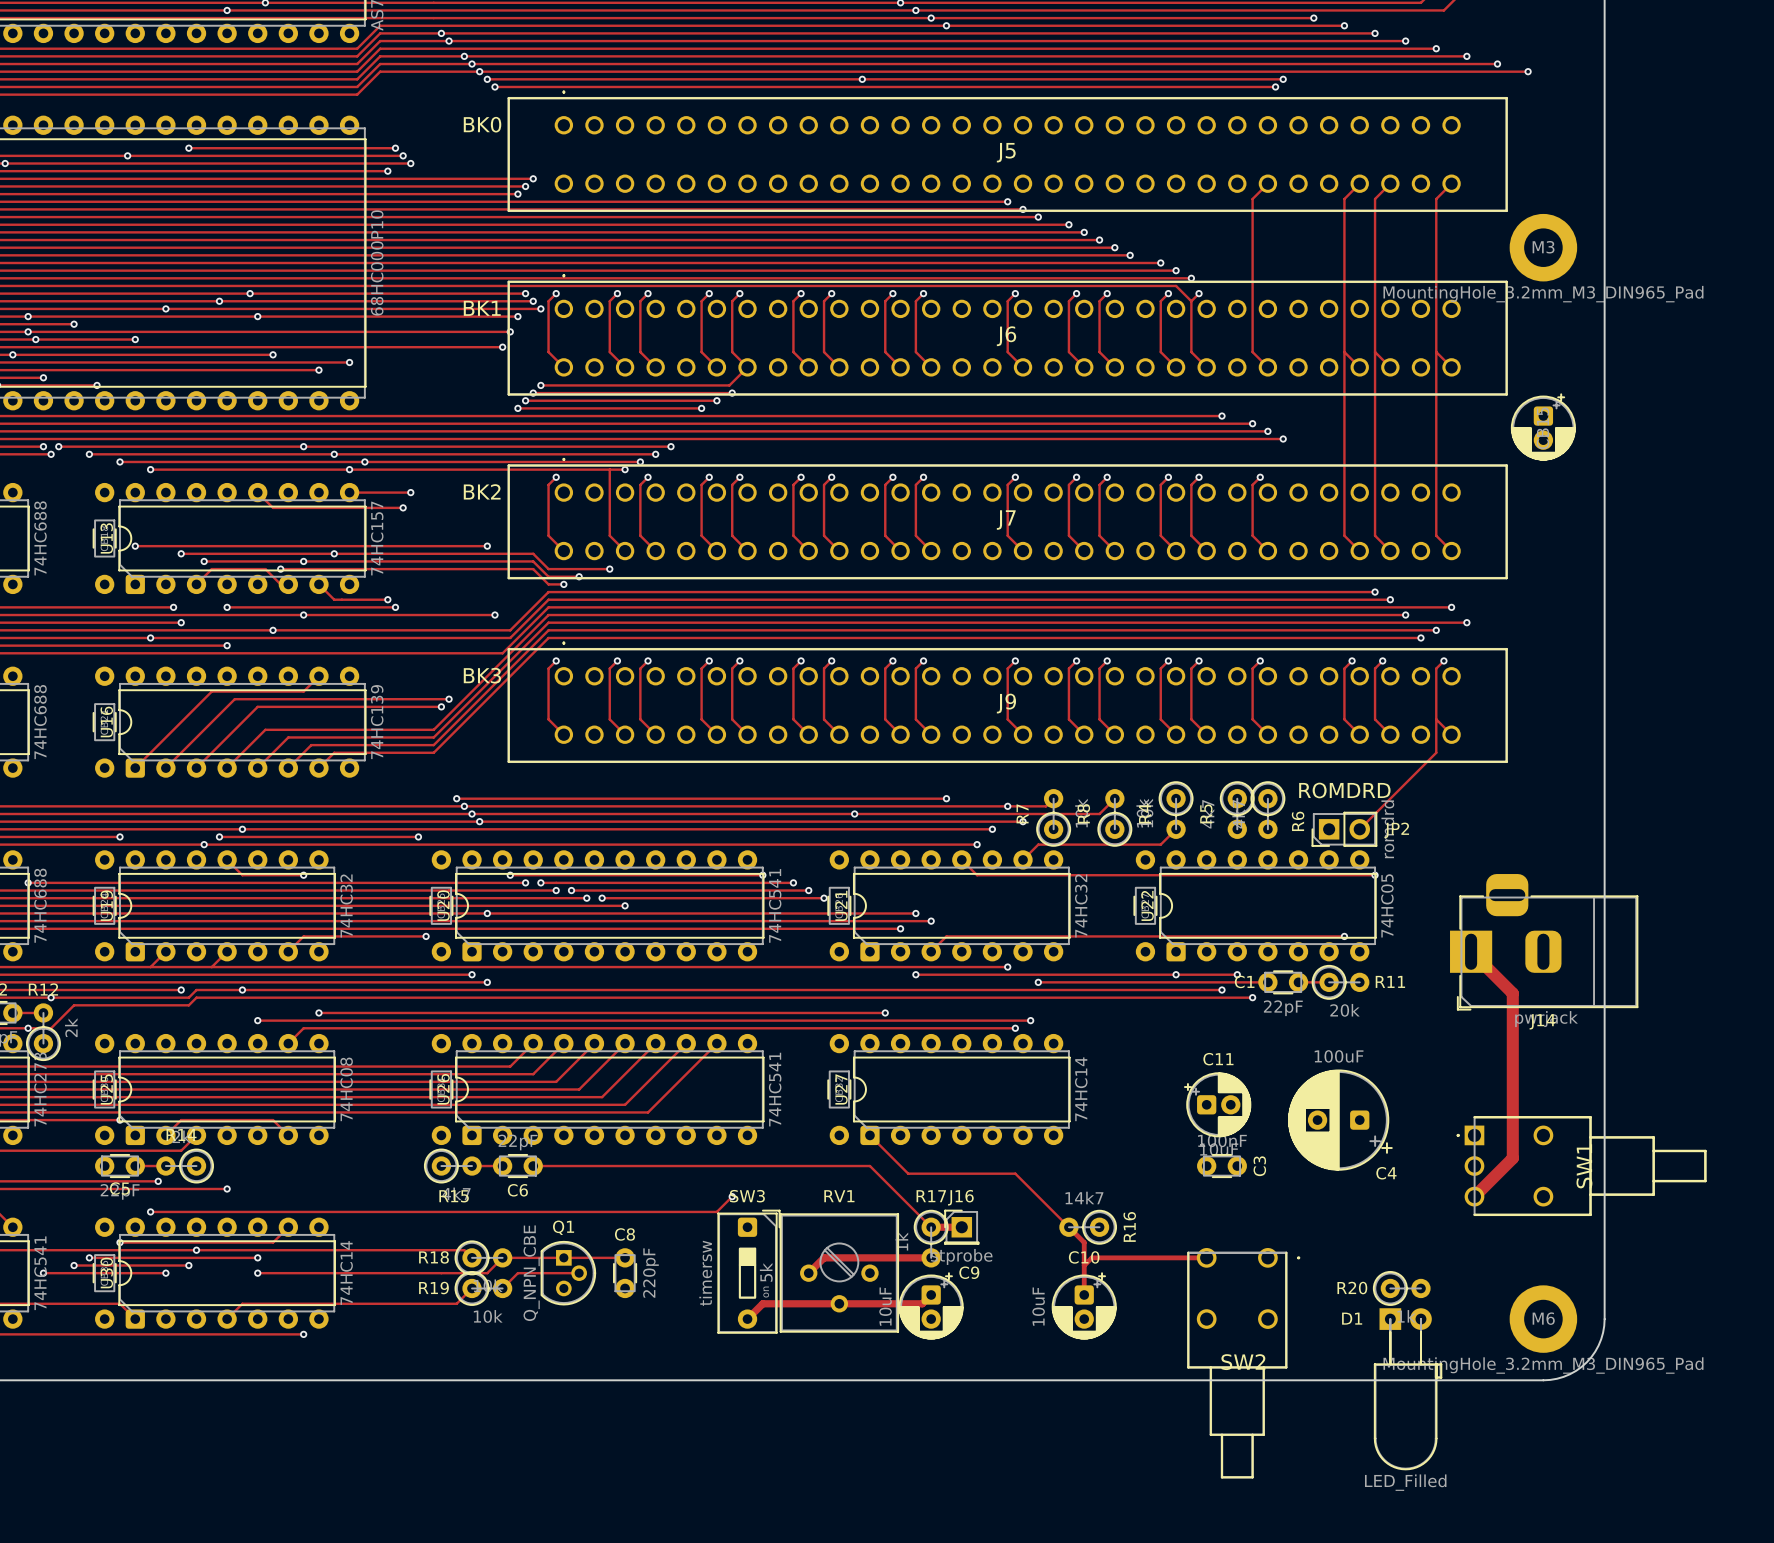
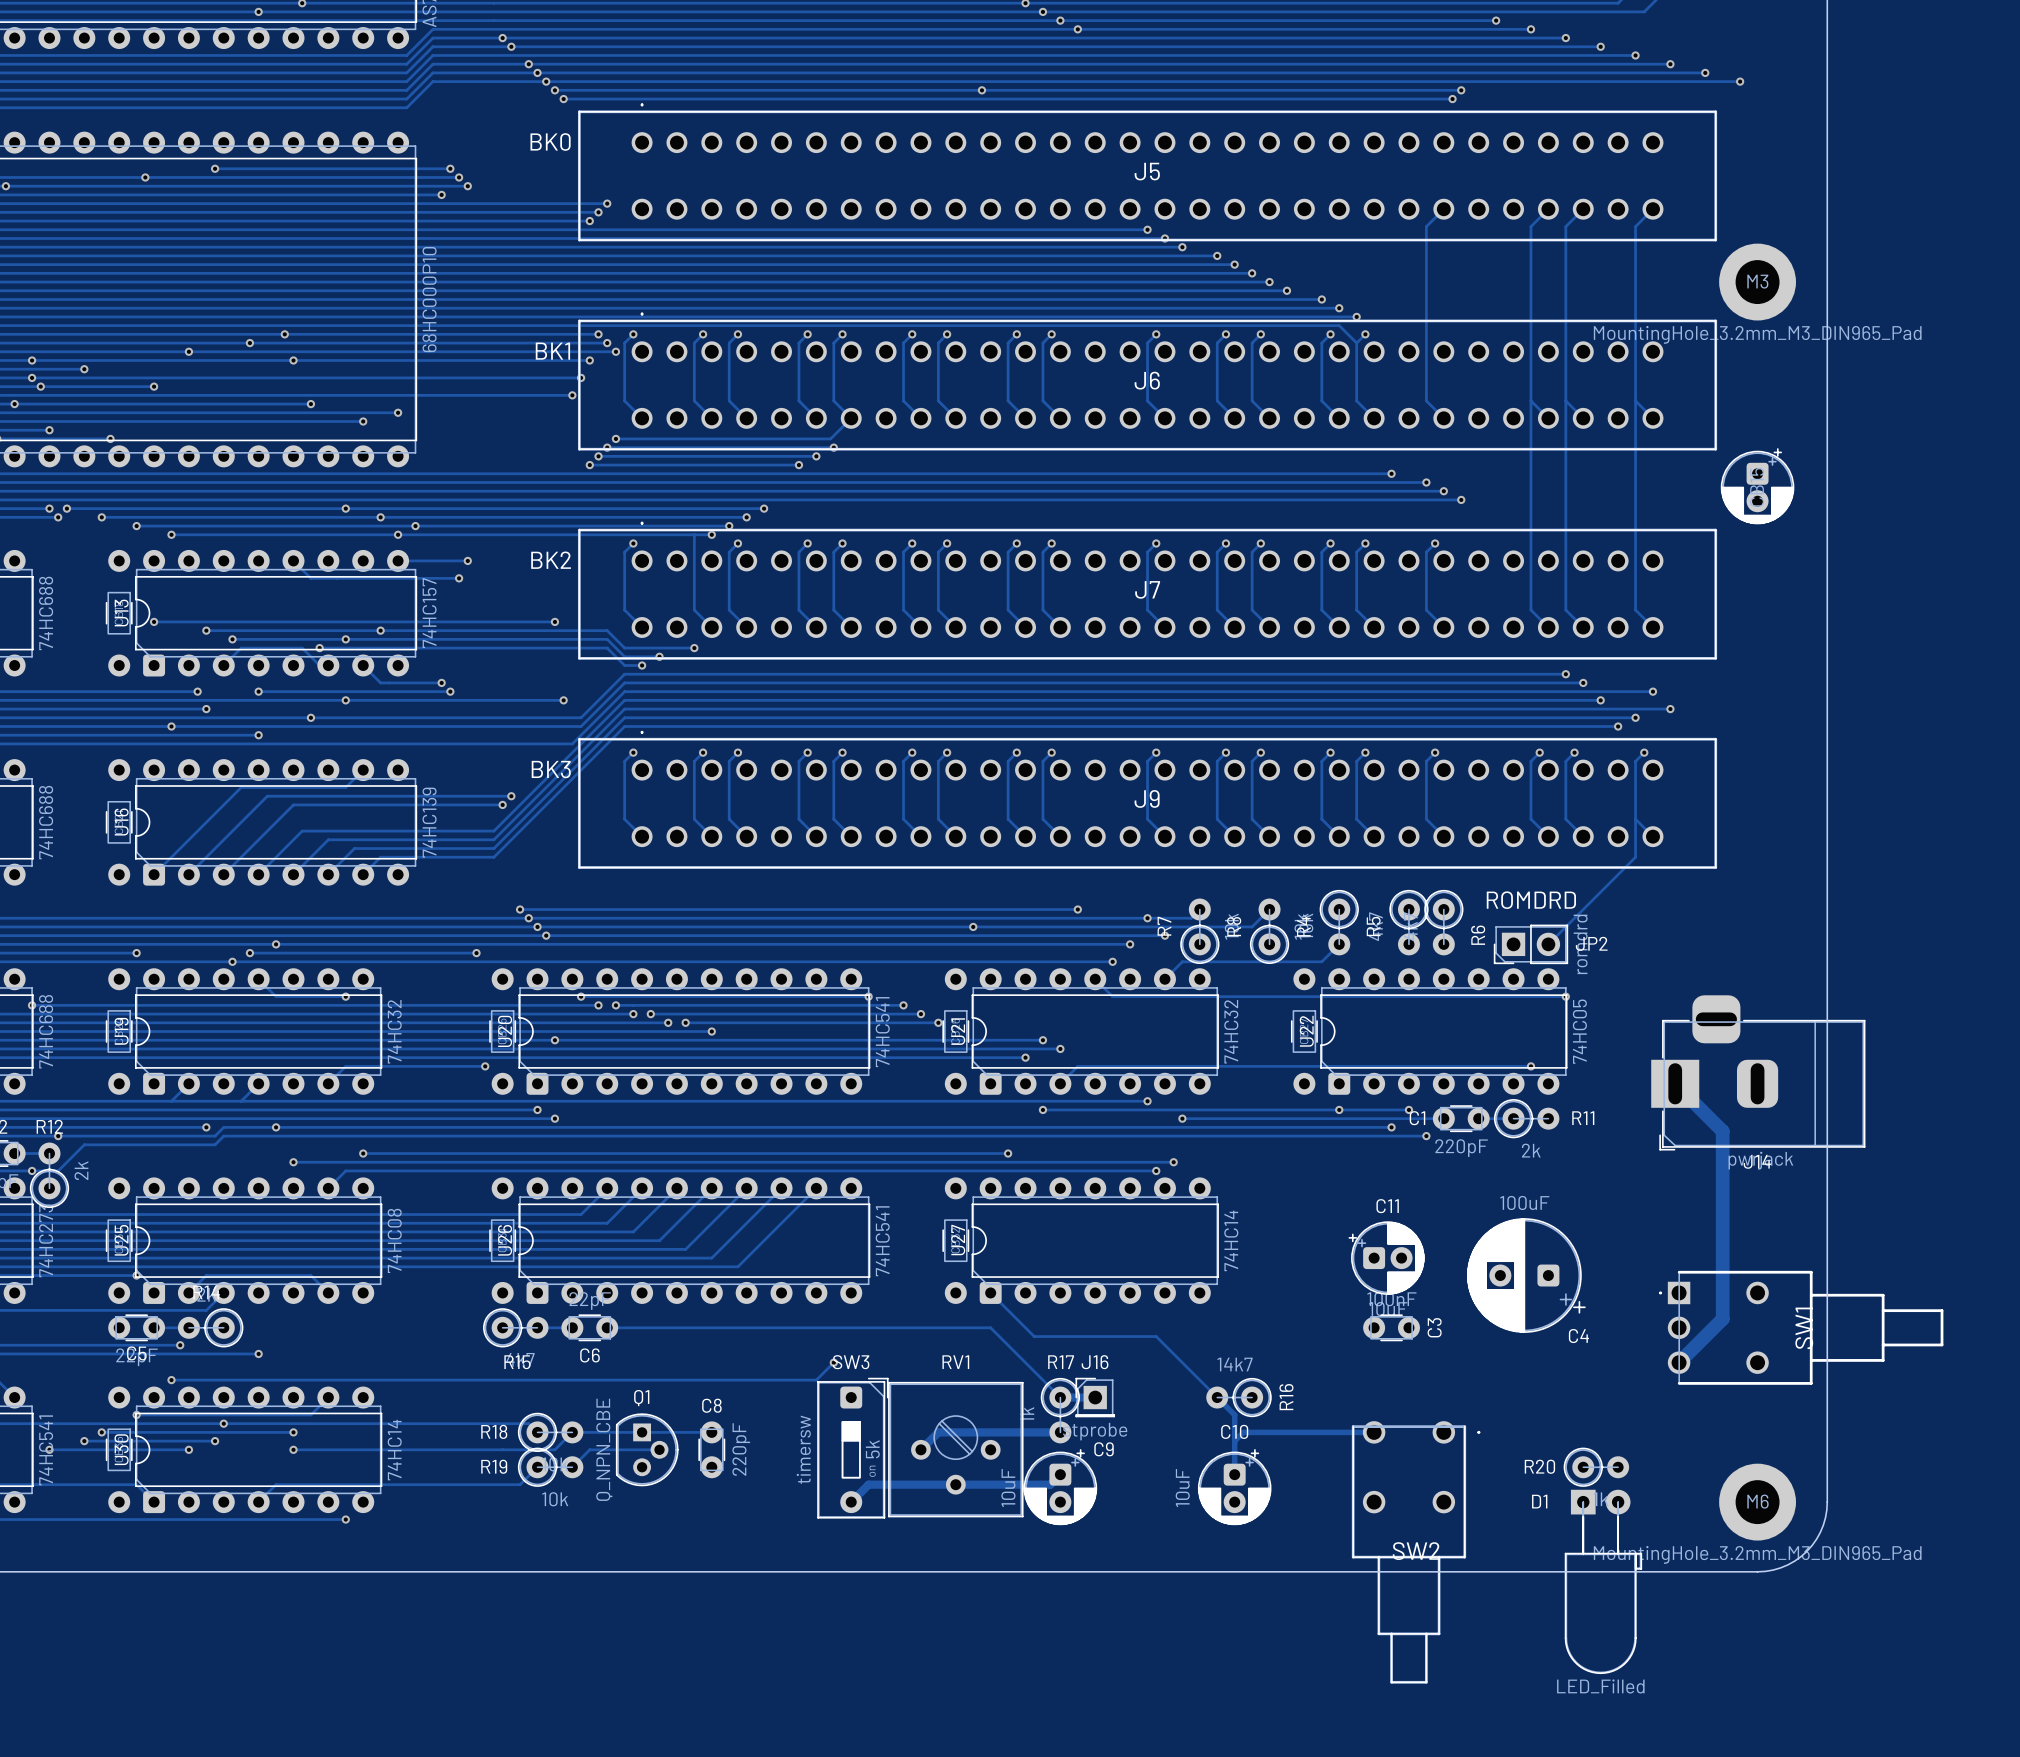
C1 value: 22pF (1283, 1008) -> 220pF (1461, 1148)
R11 value: 20k (1345, 1010) -> 2k (1531, 1150)

